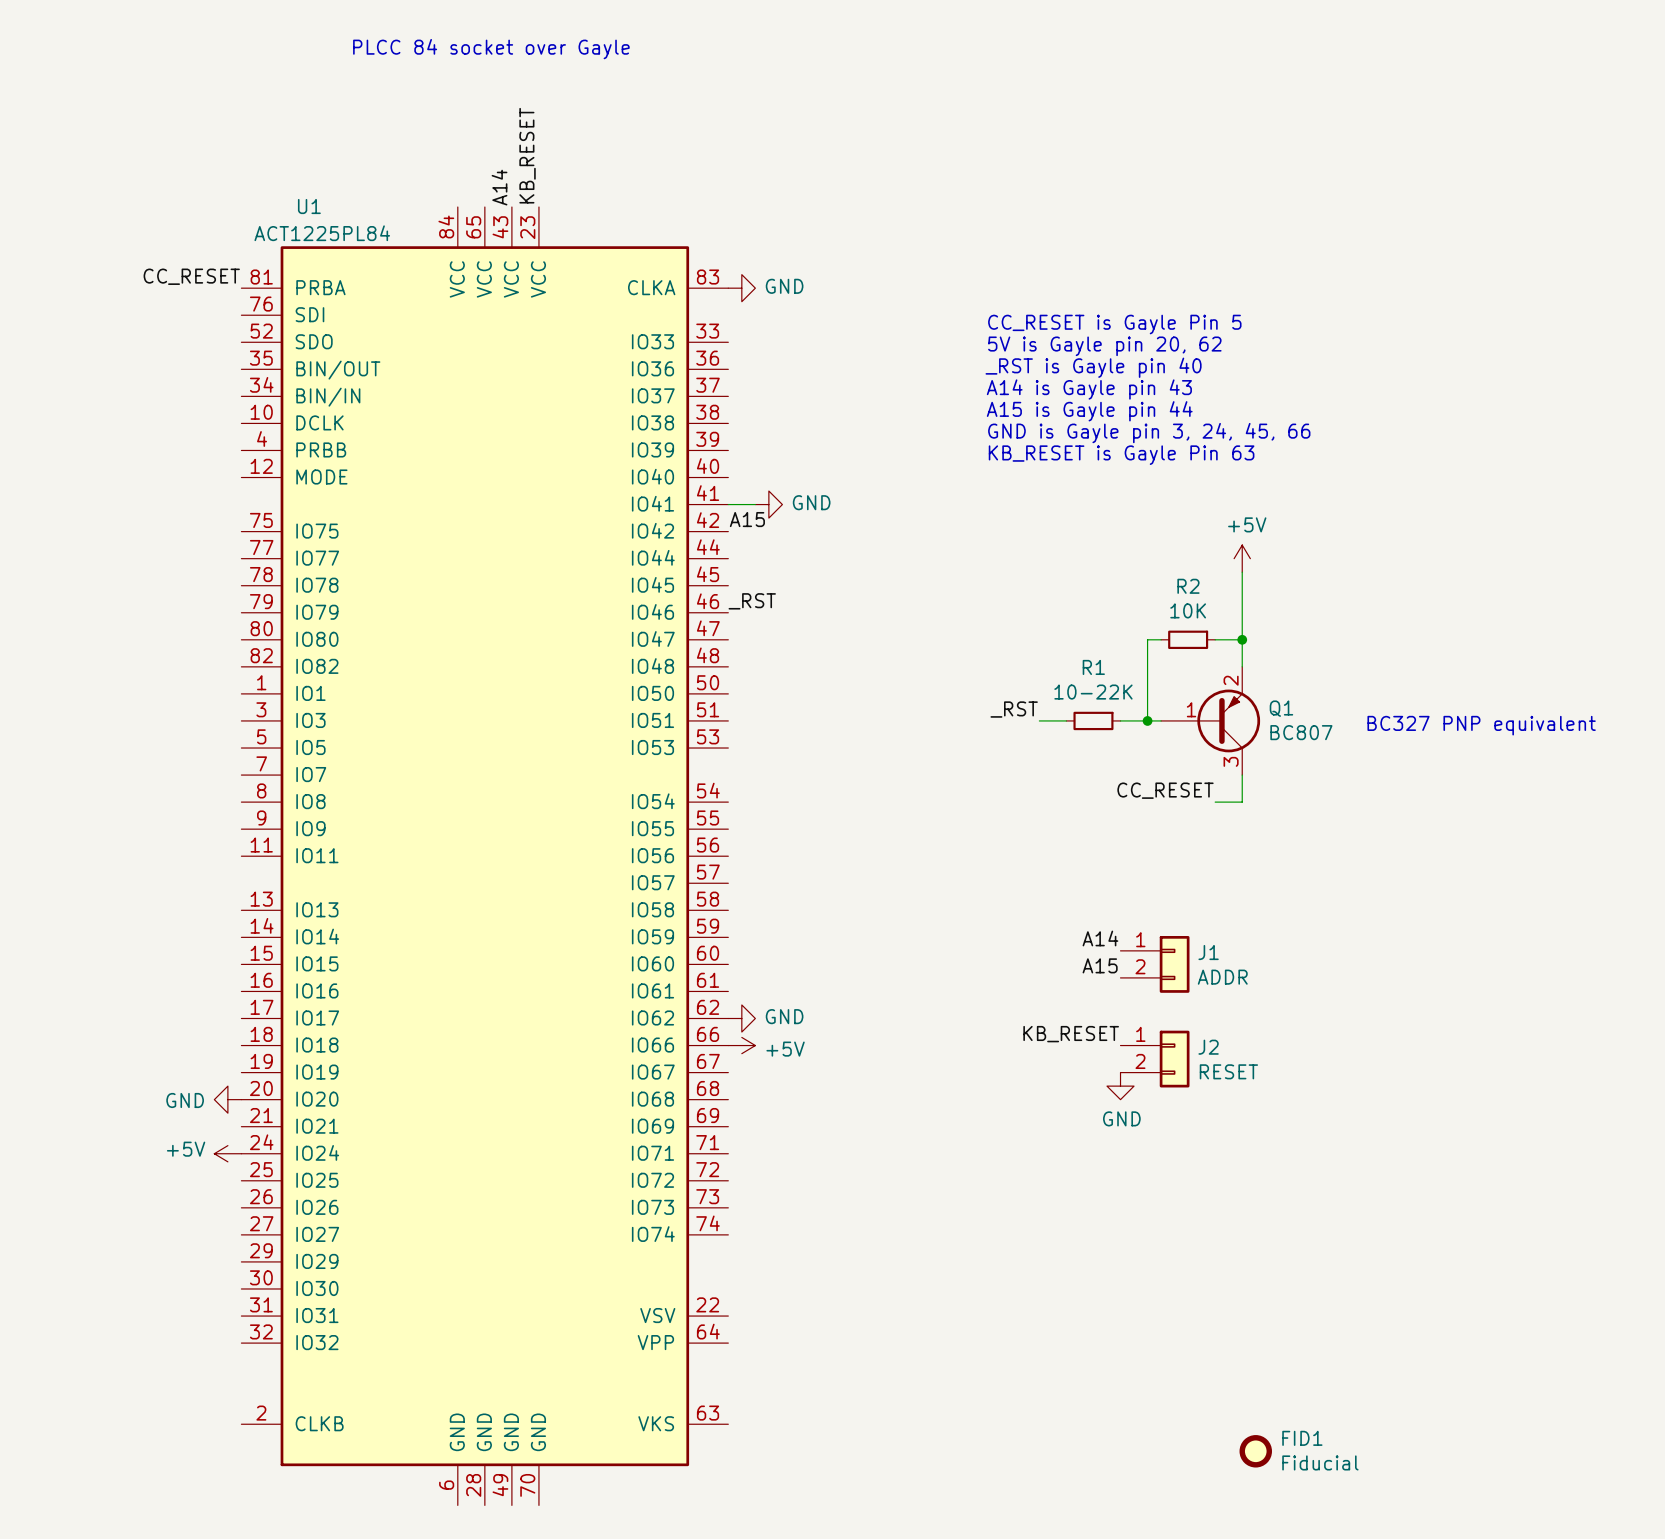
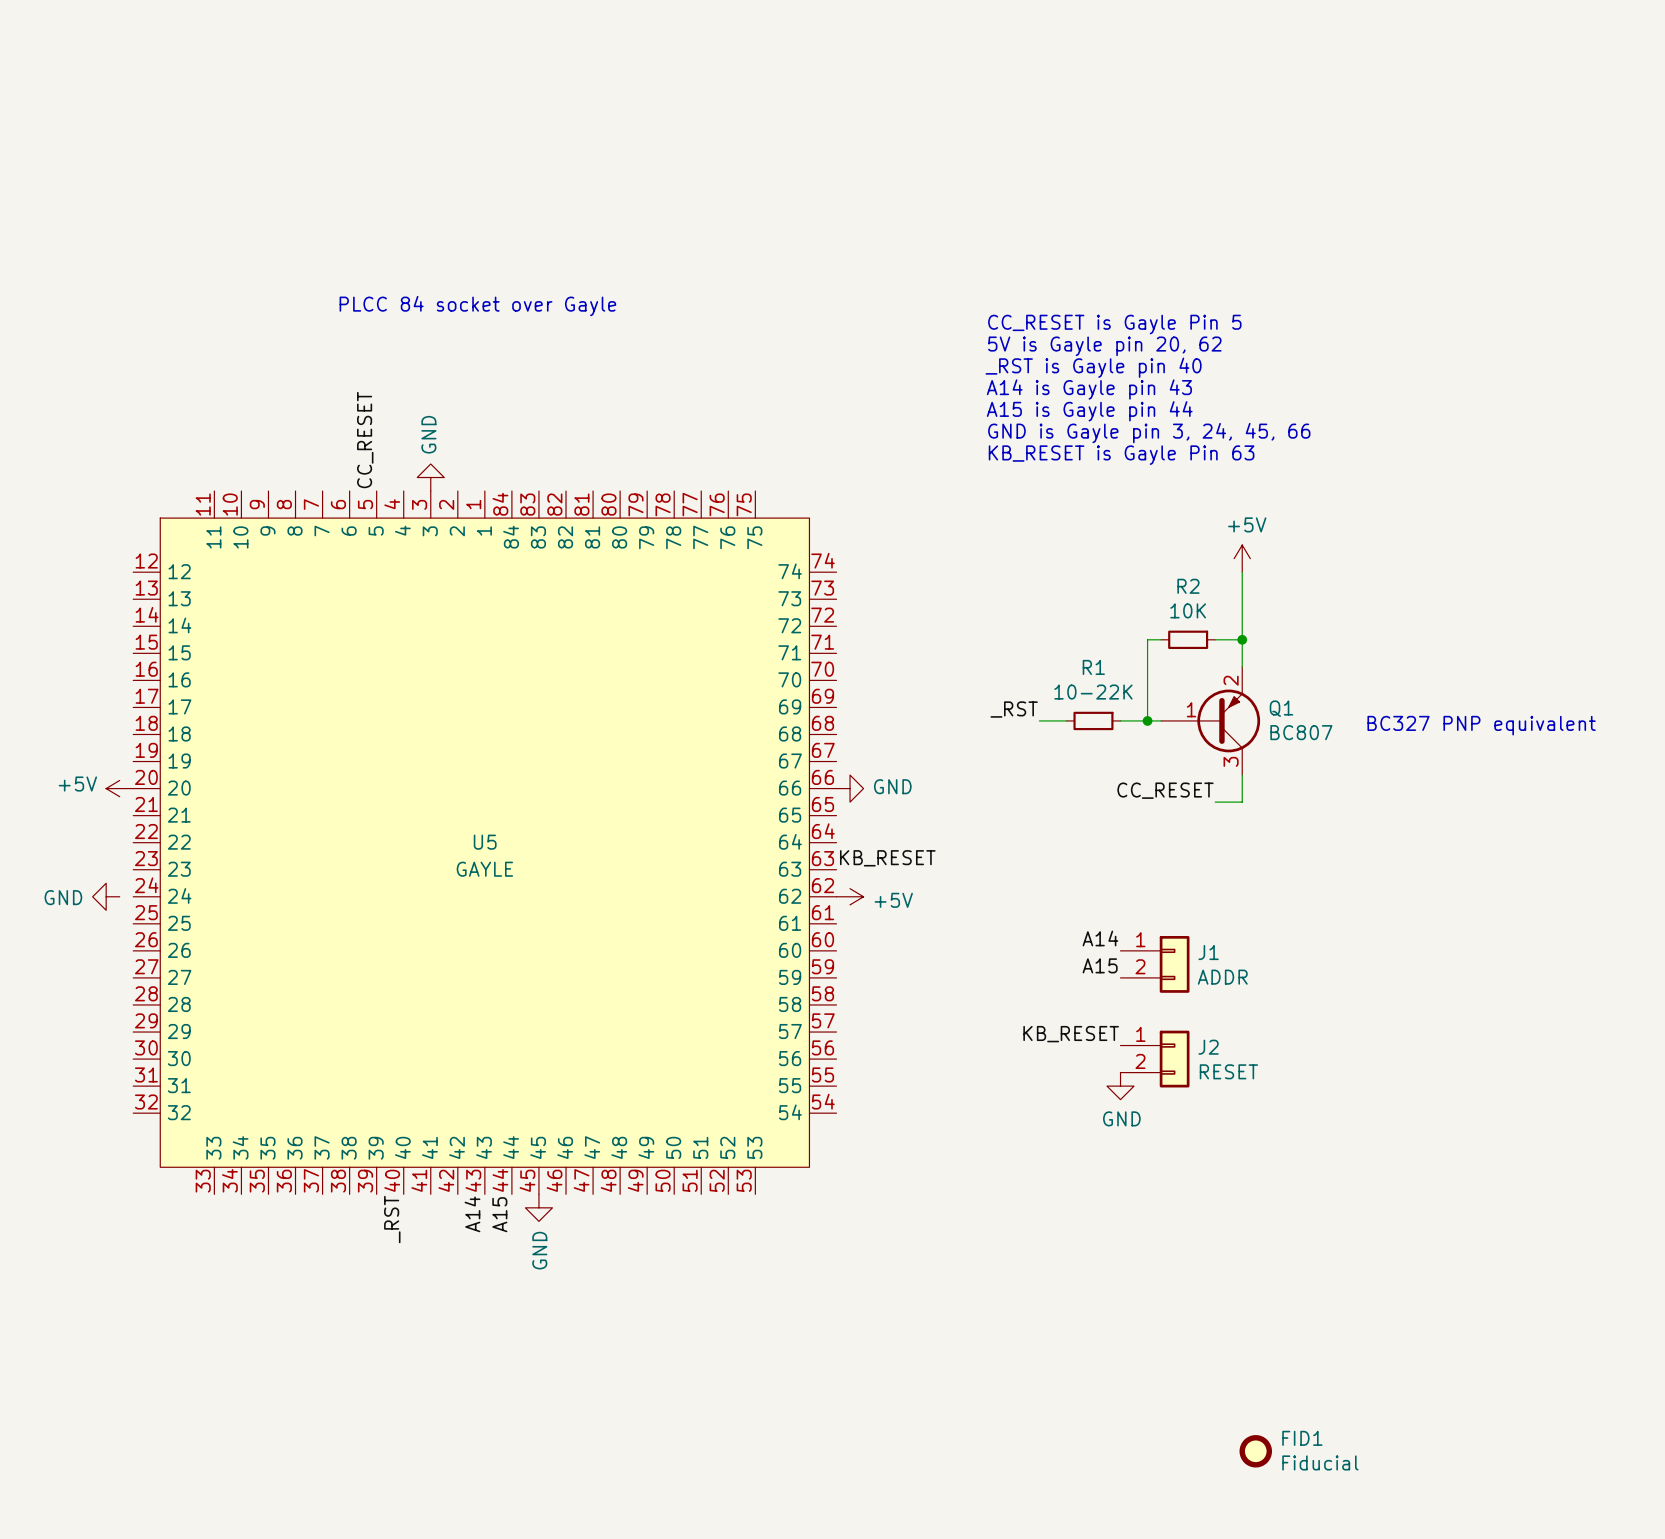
text position: PLCC 84 socket over Gayle (491, 49) -> PLCC 84 socket over Gayle (477, 306)
label: KB_RESET (527, 155) -> none
label: A14 (499, 187) -> none
label rotation: 0° (191, 276) -> 90° counterclockwise (365, 440)
label position: CC_RESET (191, 276) -> CC_RESET (365, 440)
power symbol: GND (741, 288) -> none
power symbol: none -> GND (430, 477)
wire: (728, 504) (755, 504) -> none
power symbol: GND (768, 504) -> none
label: A15 (747, 519) -> none
label: _RST (752, 601) -> none
power symbol: none -> +5V (119, 788)
power symbol: none -> GND (850, 788)
U5: none -> GAYLE (484, 842)
U1: ACT1225PL84 (484, 856) -> none
label: none -> KB_RESET (887, 858)
power symbol: none -> GND (106, 896)
power symbol: GND (741, 1018) -> none
power symbol position: +5V (741, 1045) -> +5V (850, 896)
power symbol: GND (227, 1099) -> none
power symbol: +5V (227, 1153) -> none
power symbol: none -> GND (538, 1207)
label: none -> A14 (472, 1214)
label: none -> A15 (499, 1214)
label: none -> _RST (392, 1219)

